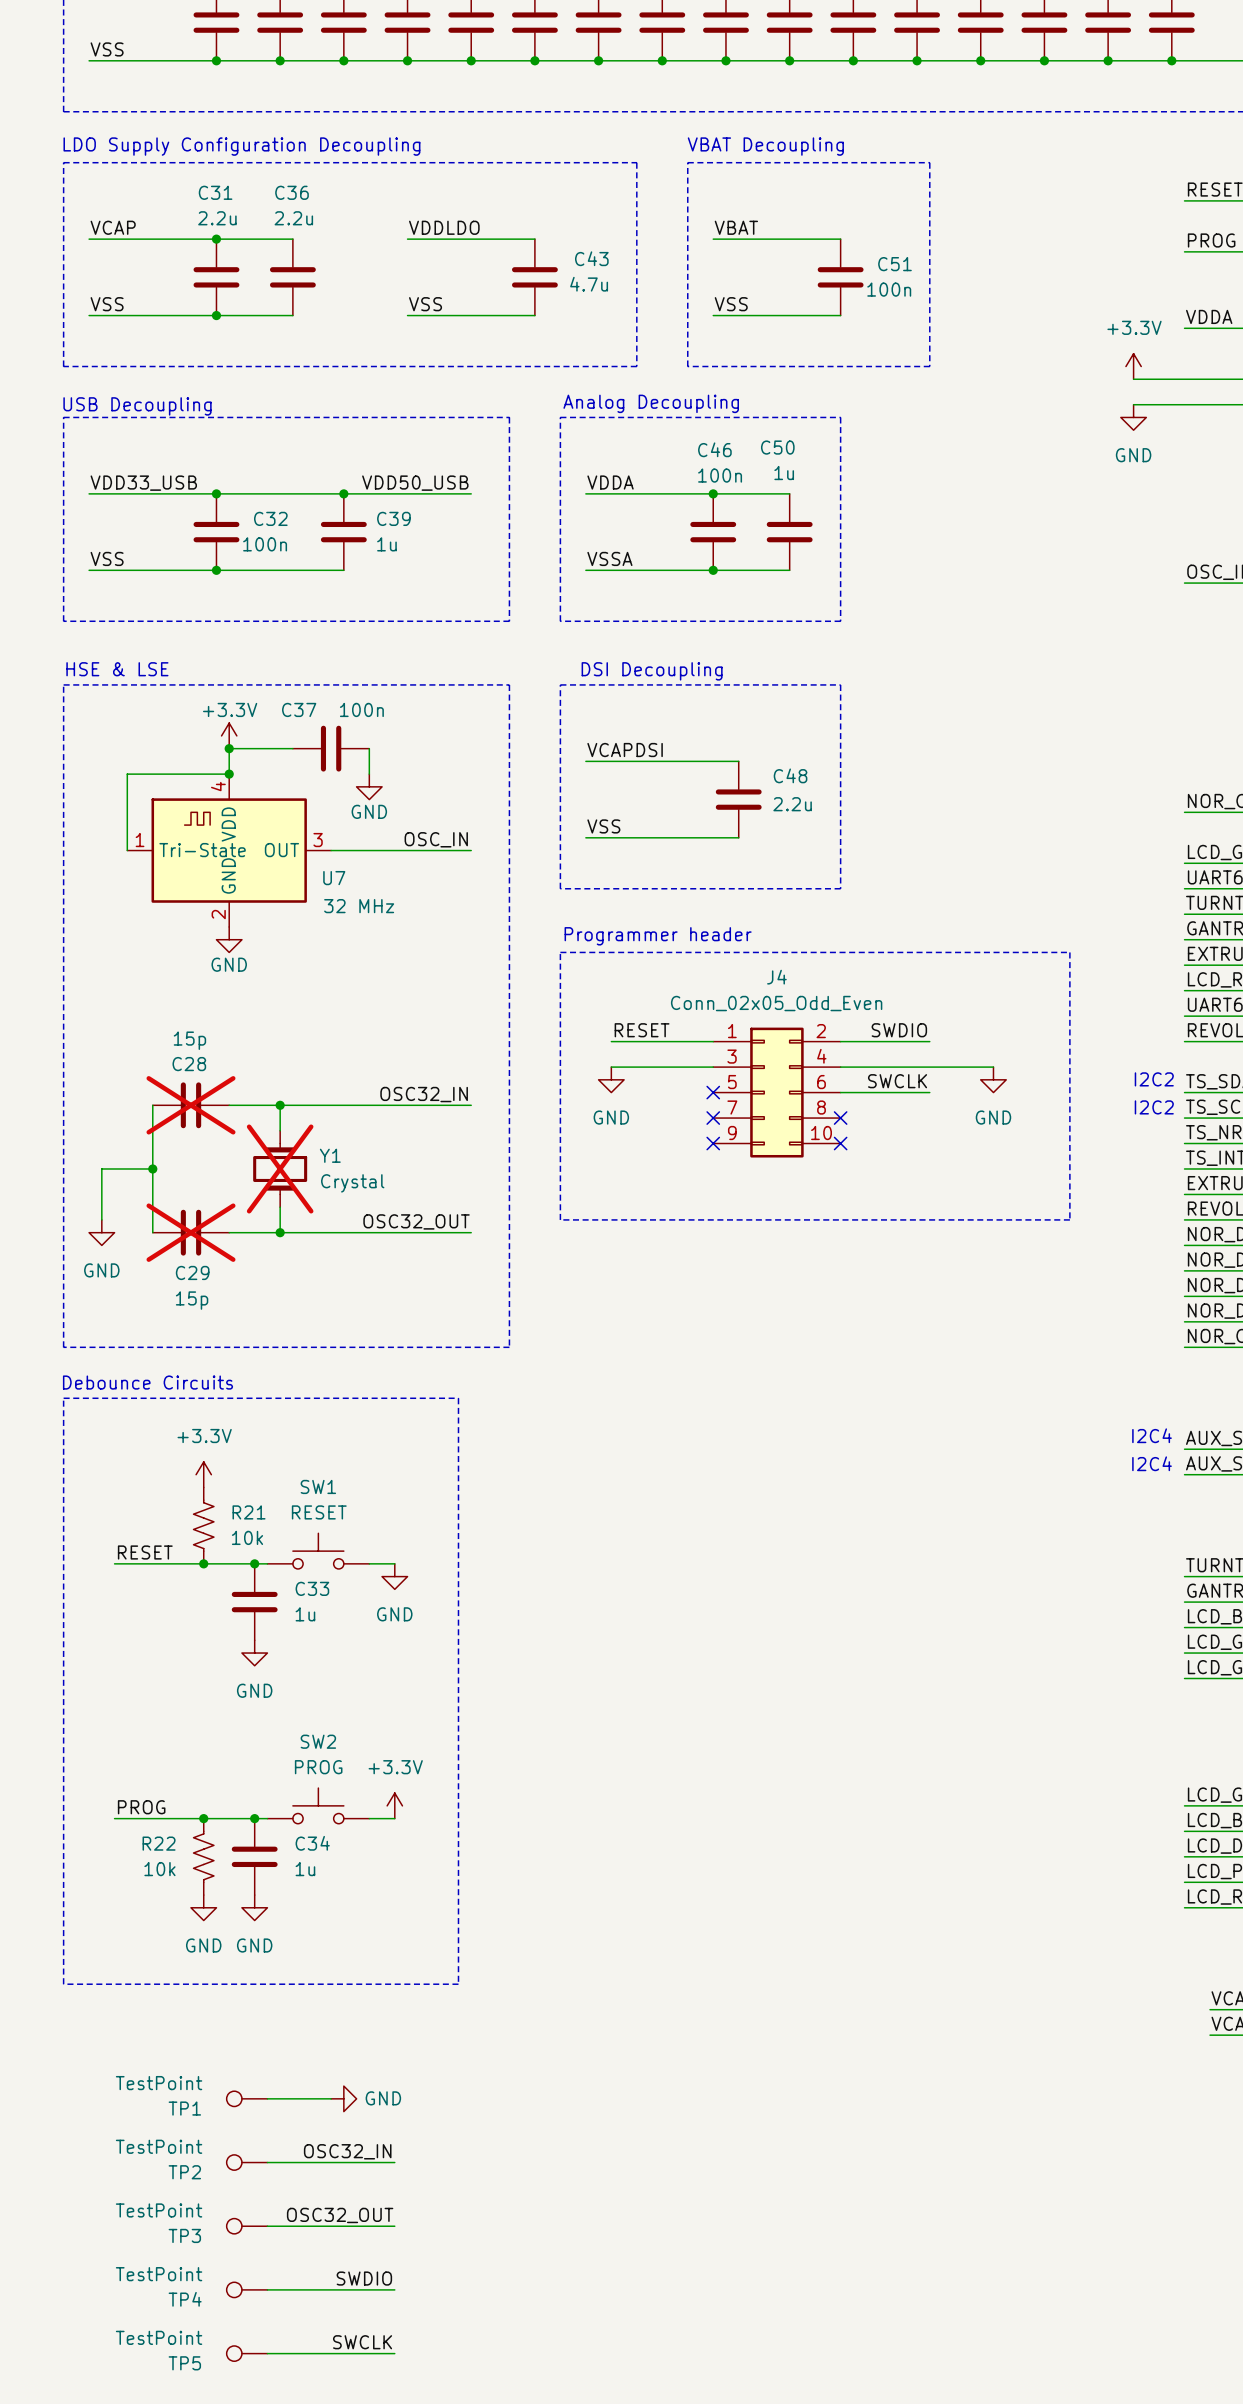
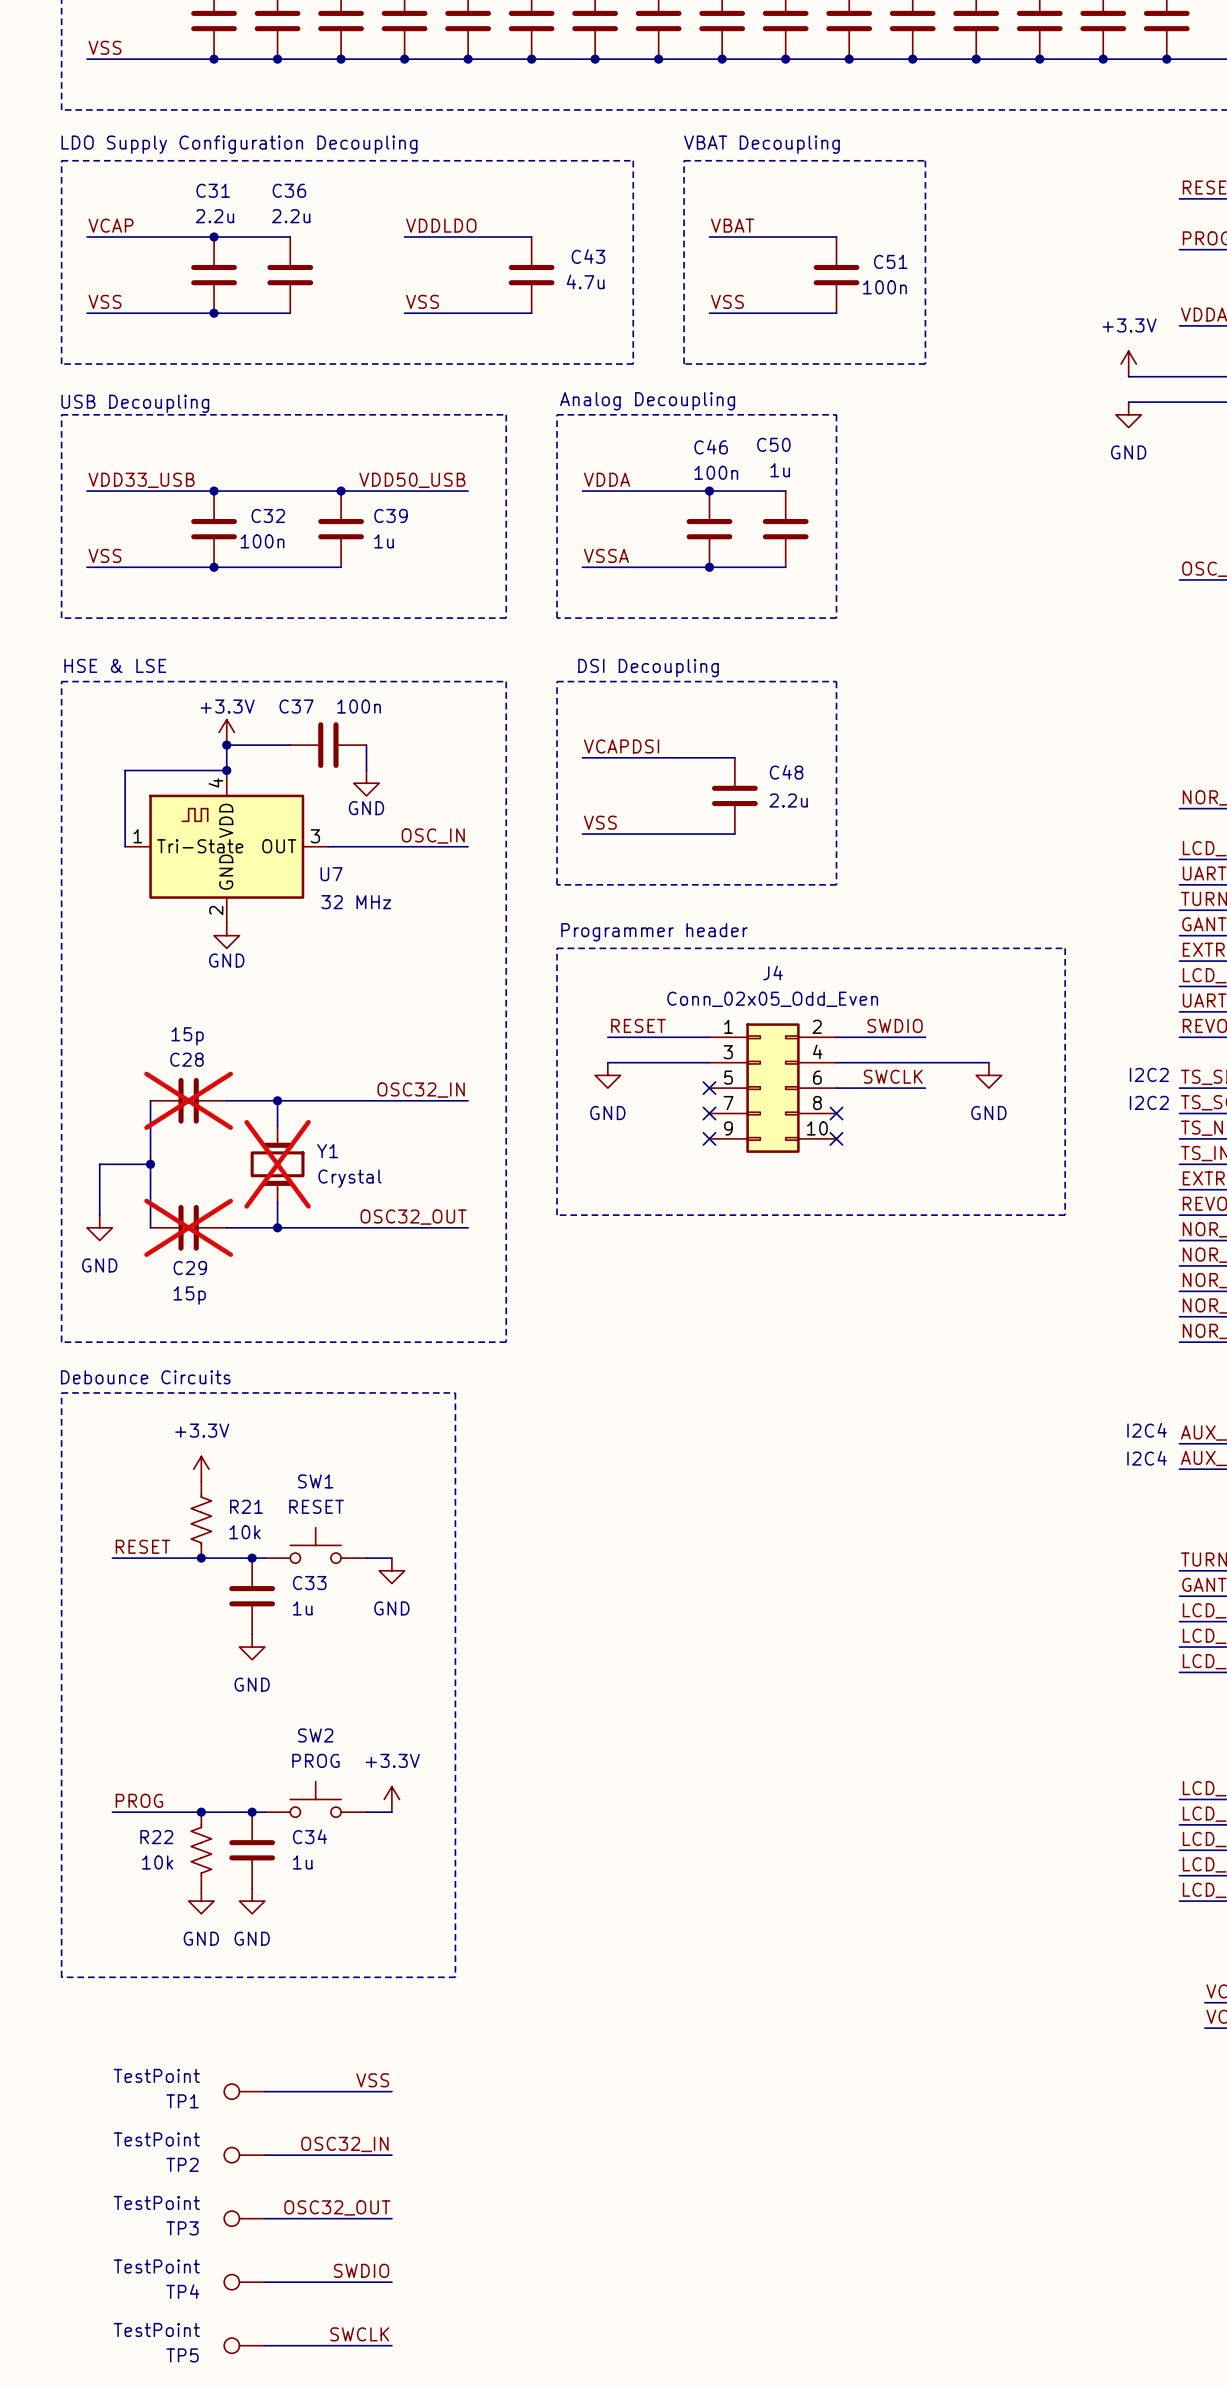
label: none -> VSS (372, 2080)
wire: none -> (328, 2091) (391, 2091)
power symbol: GND (343, 2098) -> none

